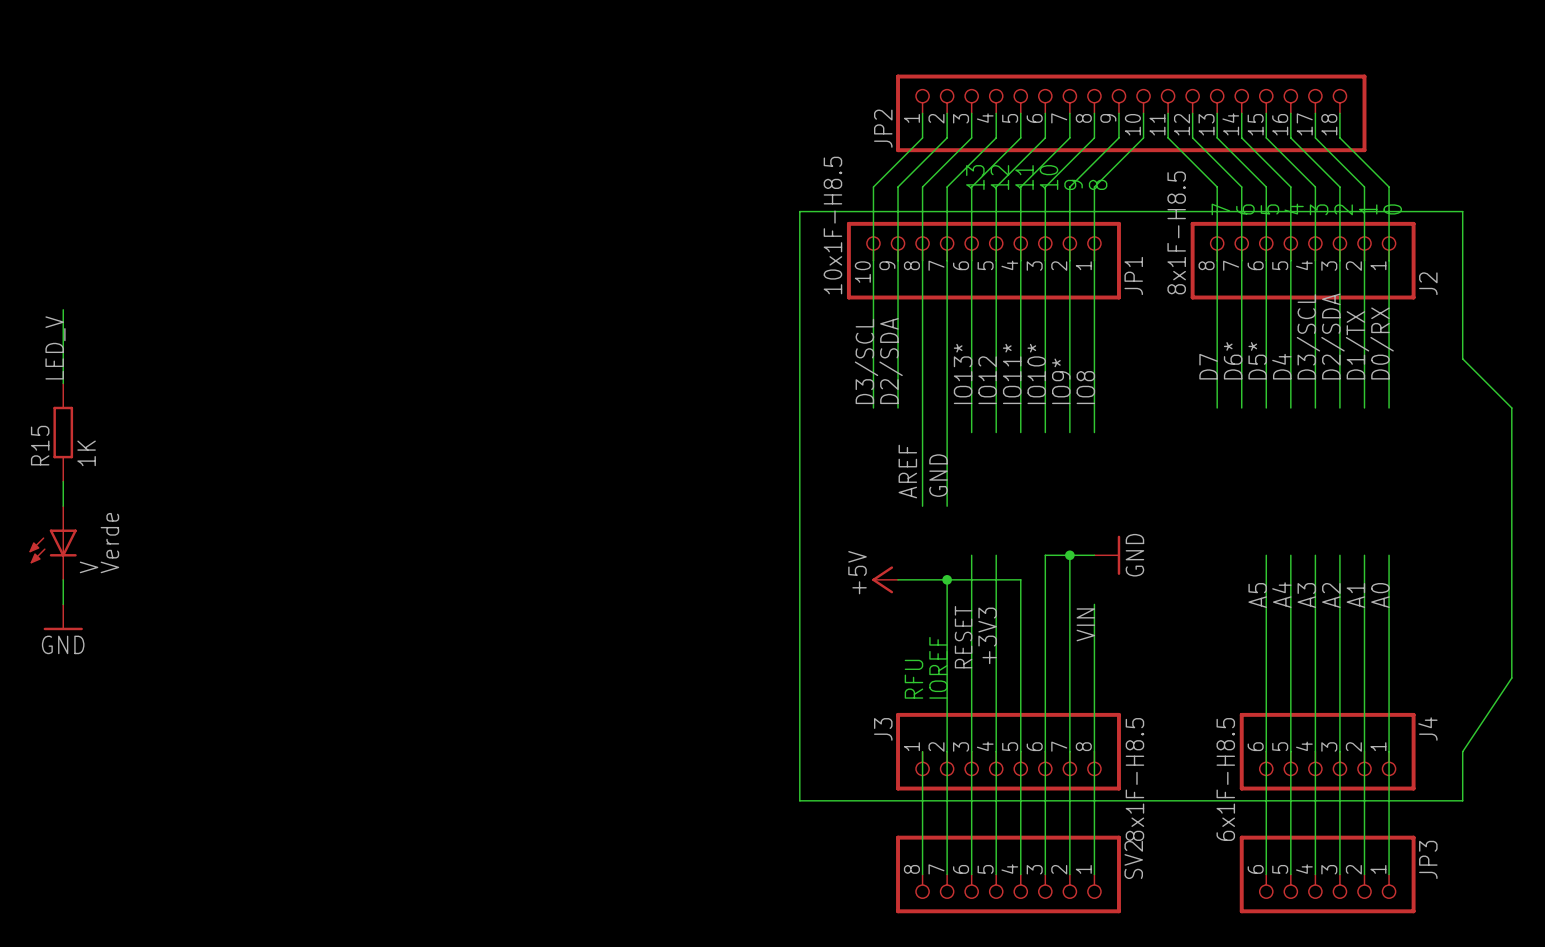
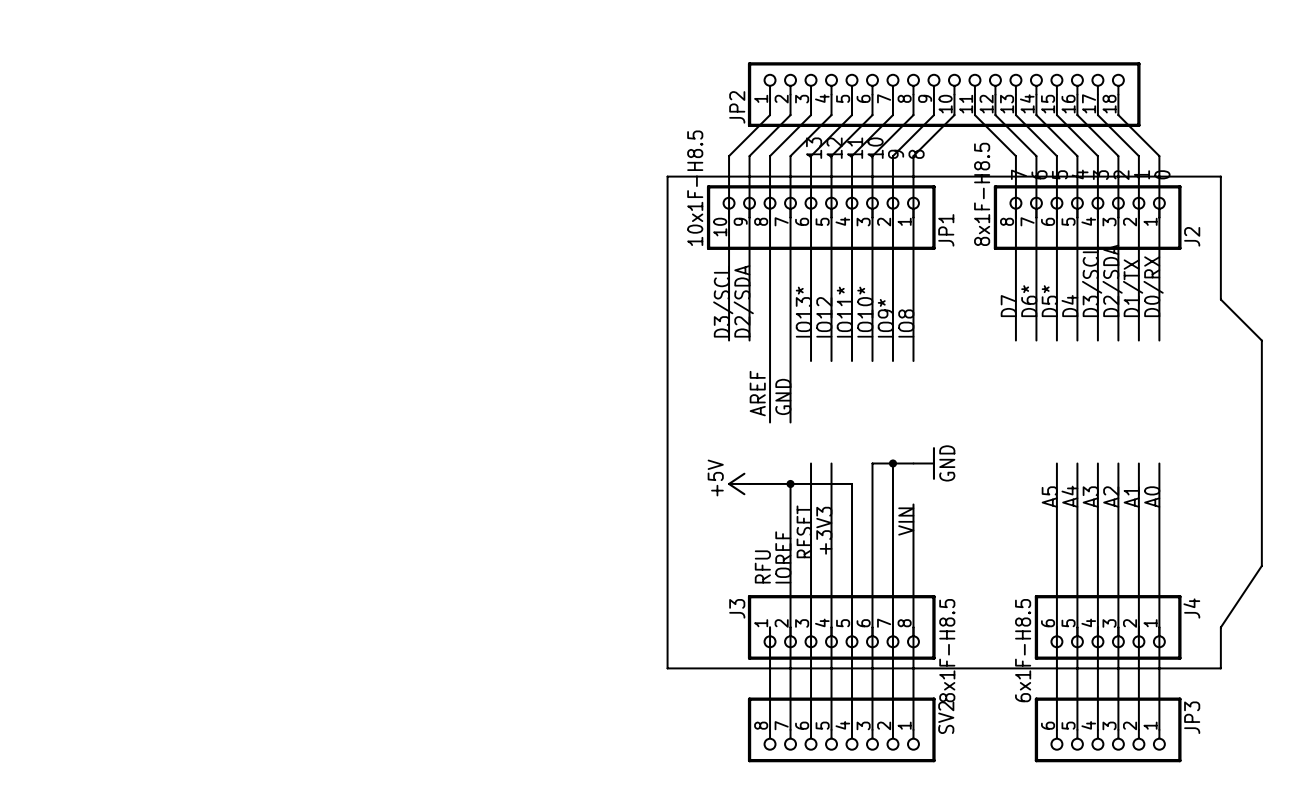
wire: (63, 309) (63, 383) -> none
label: LED_V (55, 347) -> none
R15: 1K (63, 432) -> none
wire: (63, 481) (63, 506) -> none
V: Verde (53, 543) -> none
wire: (63, 579) (63, 604) -> none
power symbol: GND (63, 617) -> none

